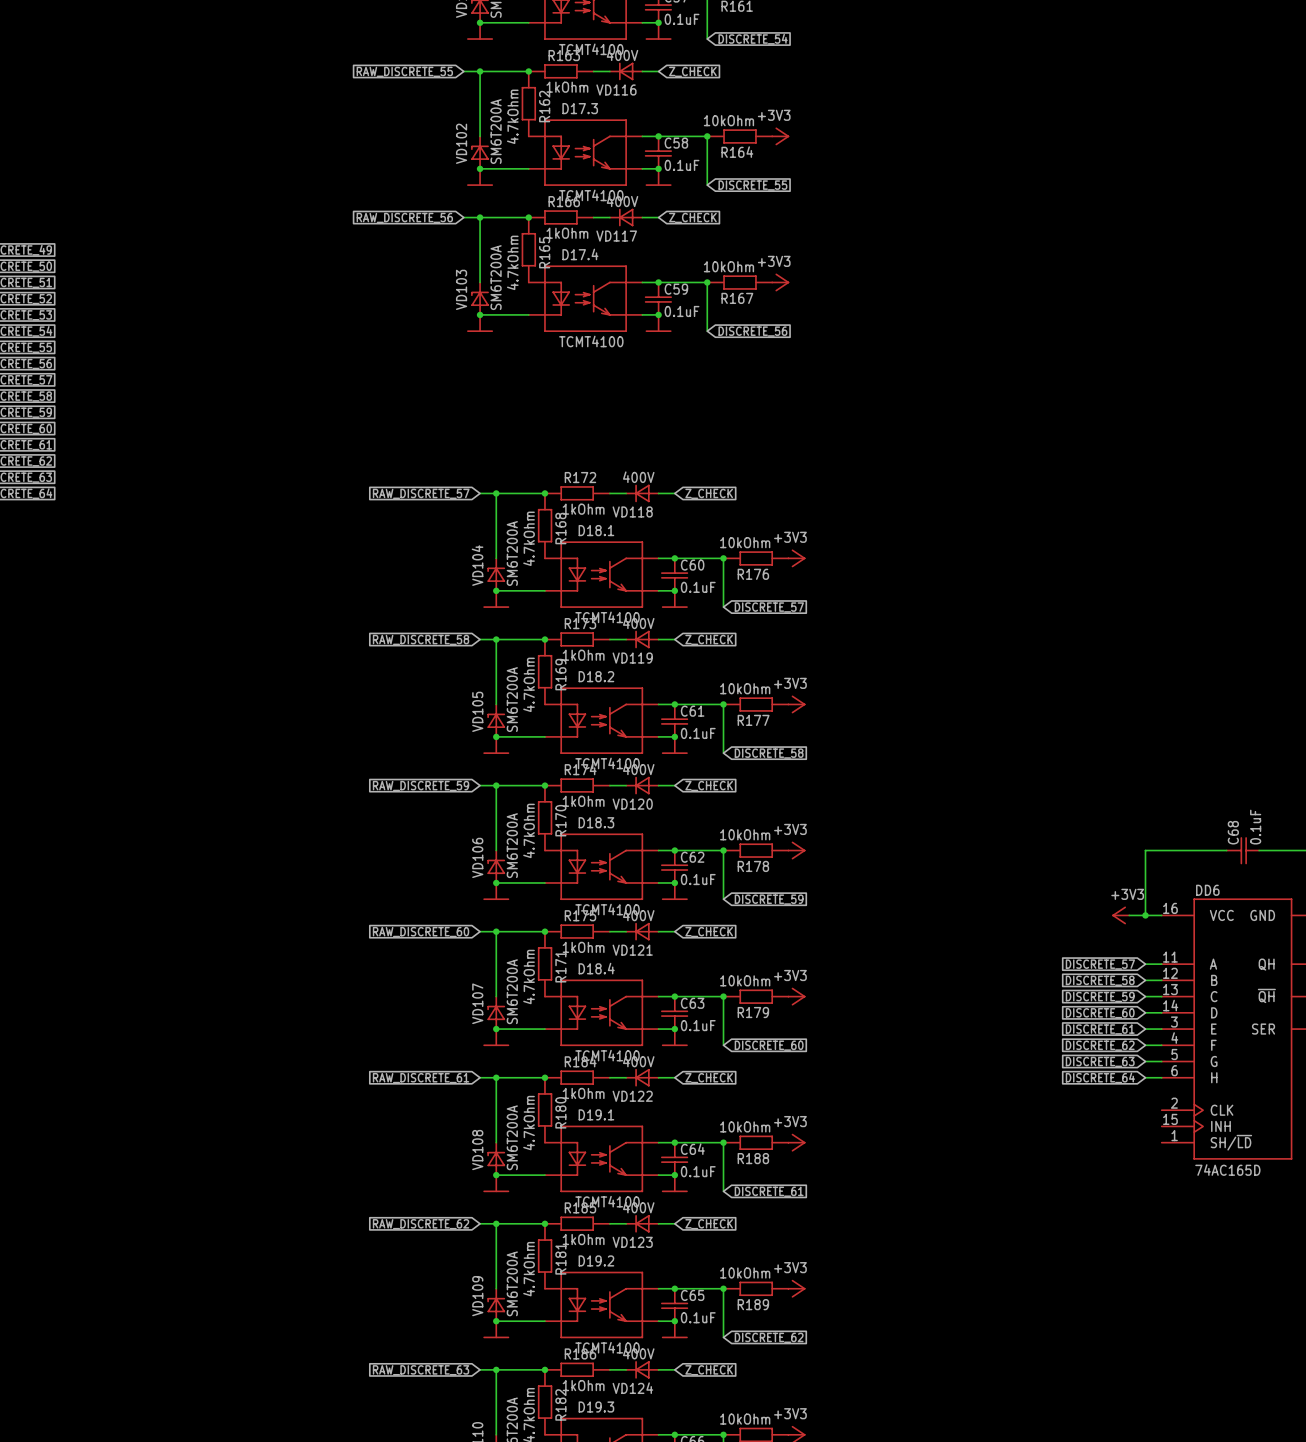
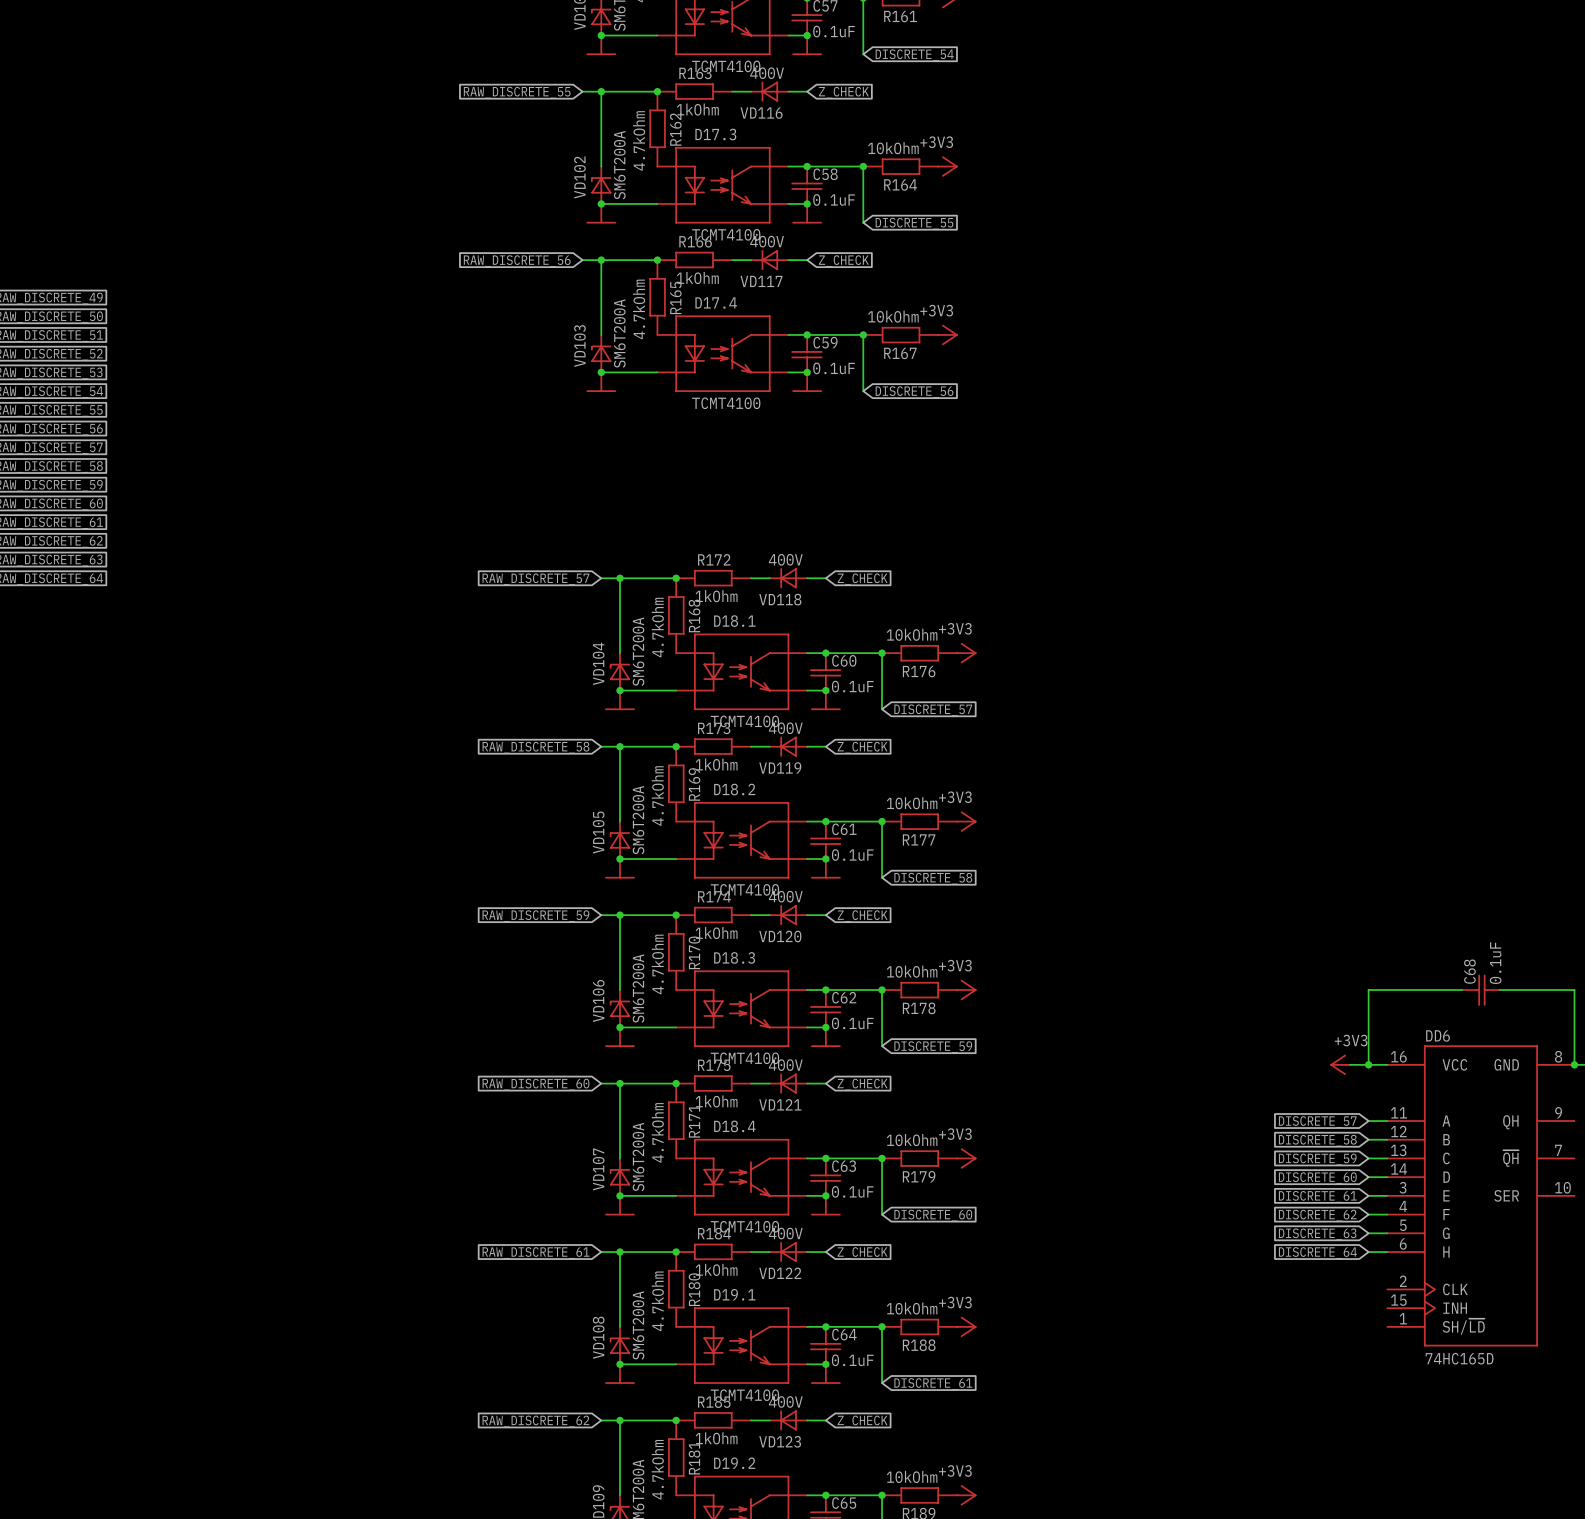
DD6 value: 74AC165D (1227, 1170) -> 74HC165D (1459, 1358)

